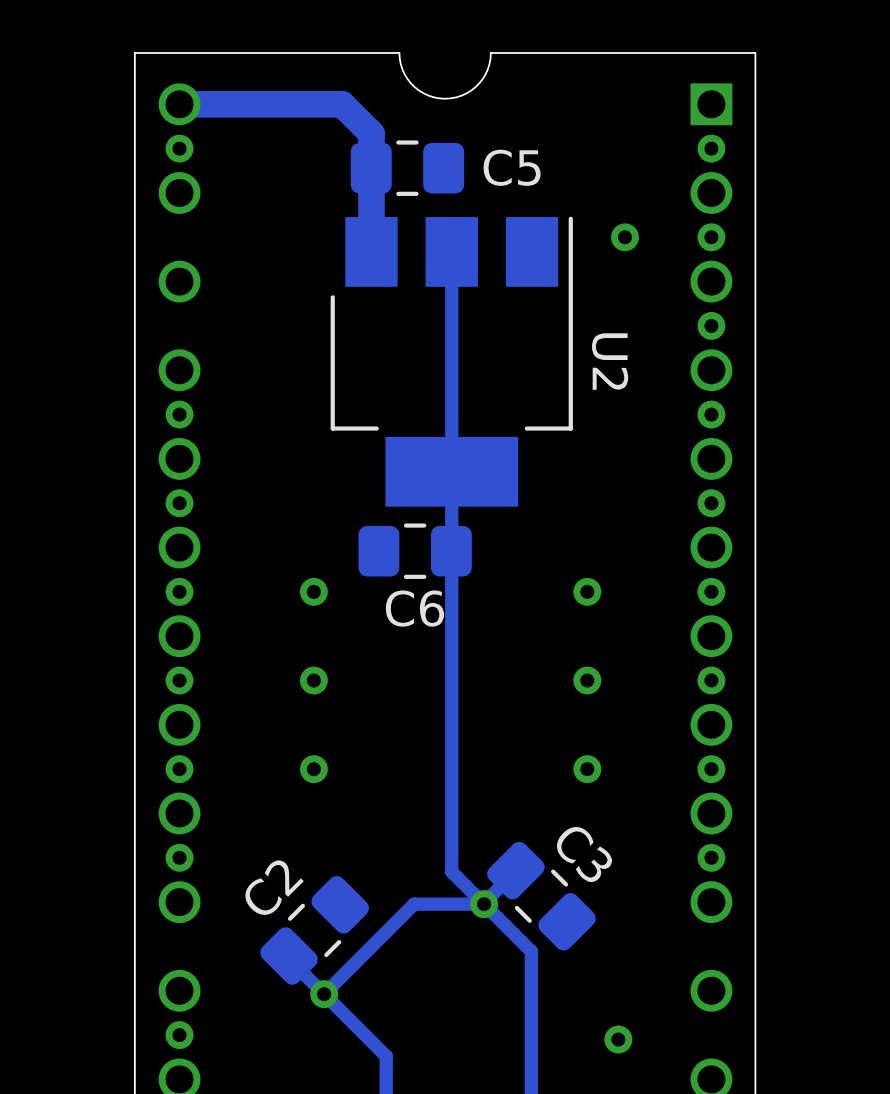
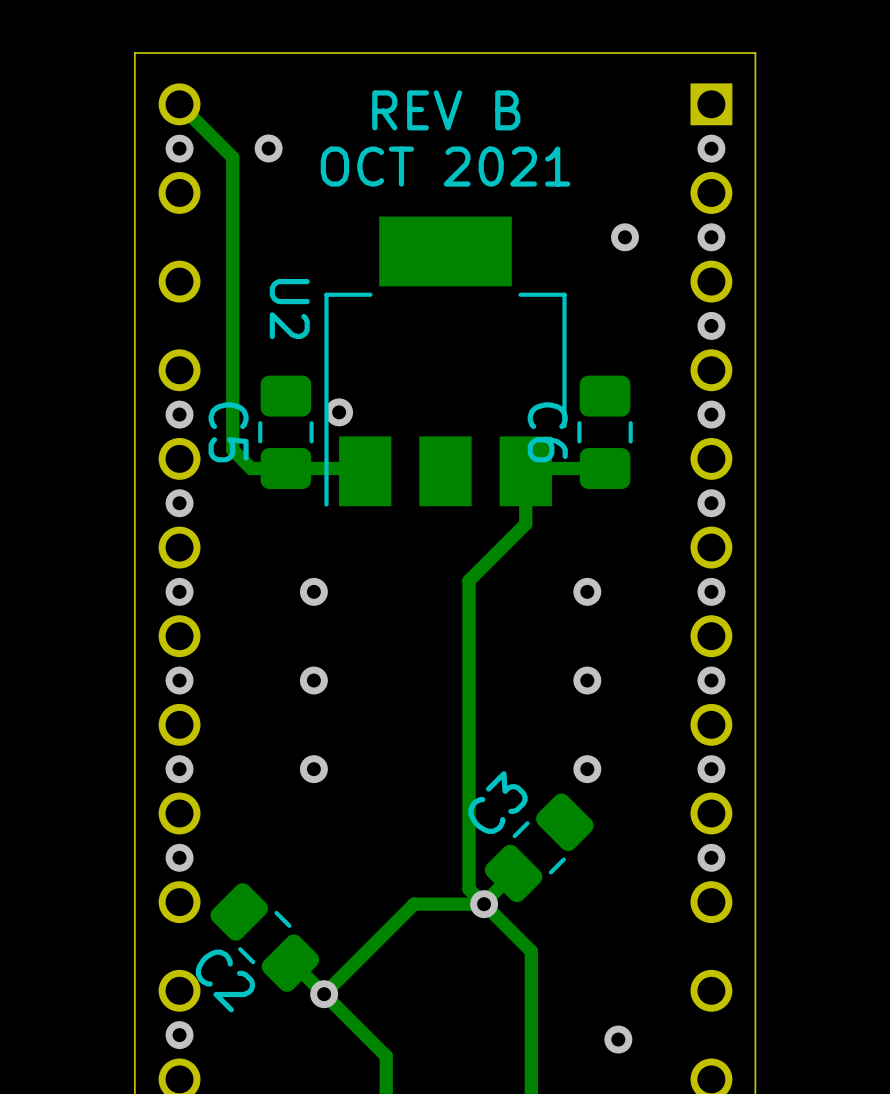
board edge: (490, 53) (485, 74) (475, 87) (461, 95) (445, 98) (428, 95) (414, 87) (404, 74) (399, 53) -> (490, 53) (399, 53)
track: (179, 104) (342, 104) (371, 133) (371, 251) -> (179, 104) (232, 157) (232, 450) (251, 468) (362, 468) (365, 471)
text: none -> REV B (446, 110)
via: none -> (268, 148)
text: none -> OCT 2021 (445, 166)
C5 name position: C5 (512, 167) -> C5 (228, 432)
C5 rotation: 0° (407, 168) -> 90° clockwise (285, 432)
C5 position: (407, 168) -> (285, 432)
track: (451, 251) (451, 871) (469, 889) -> (605, 468) (528, 468) (525, 471) (525, 523) (469, 580) (469, 889)
U2 rotation: 0° (451, 361) -> 180° (445, 361)
via: none -> (339, 412)
C6 rotation: 0° (415, 551) -> 90° clockwise (605, 432)
C6 position: (415, 551) -> (605, 432)
C3 name position: C3 (584, 854) -> C3 (498, 802)
C2 name position: C2 (274, 887) -> C2 (225, 981)
C3 rotation: 0° (541, 896) -> 90° clockwise (539, 847)
C2 rotation: 0° (314, 930) -> 90° clockwise (264, 937)

